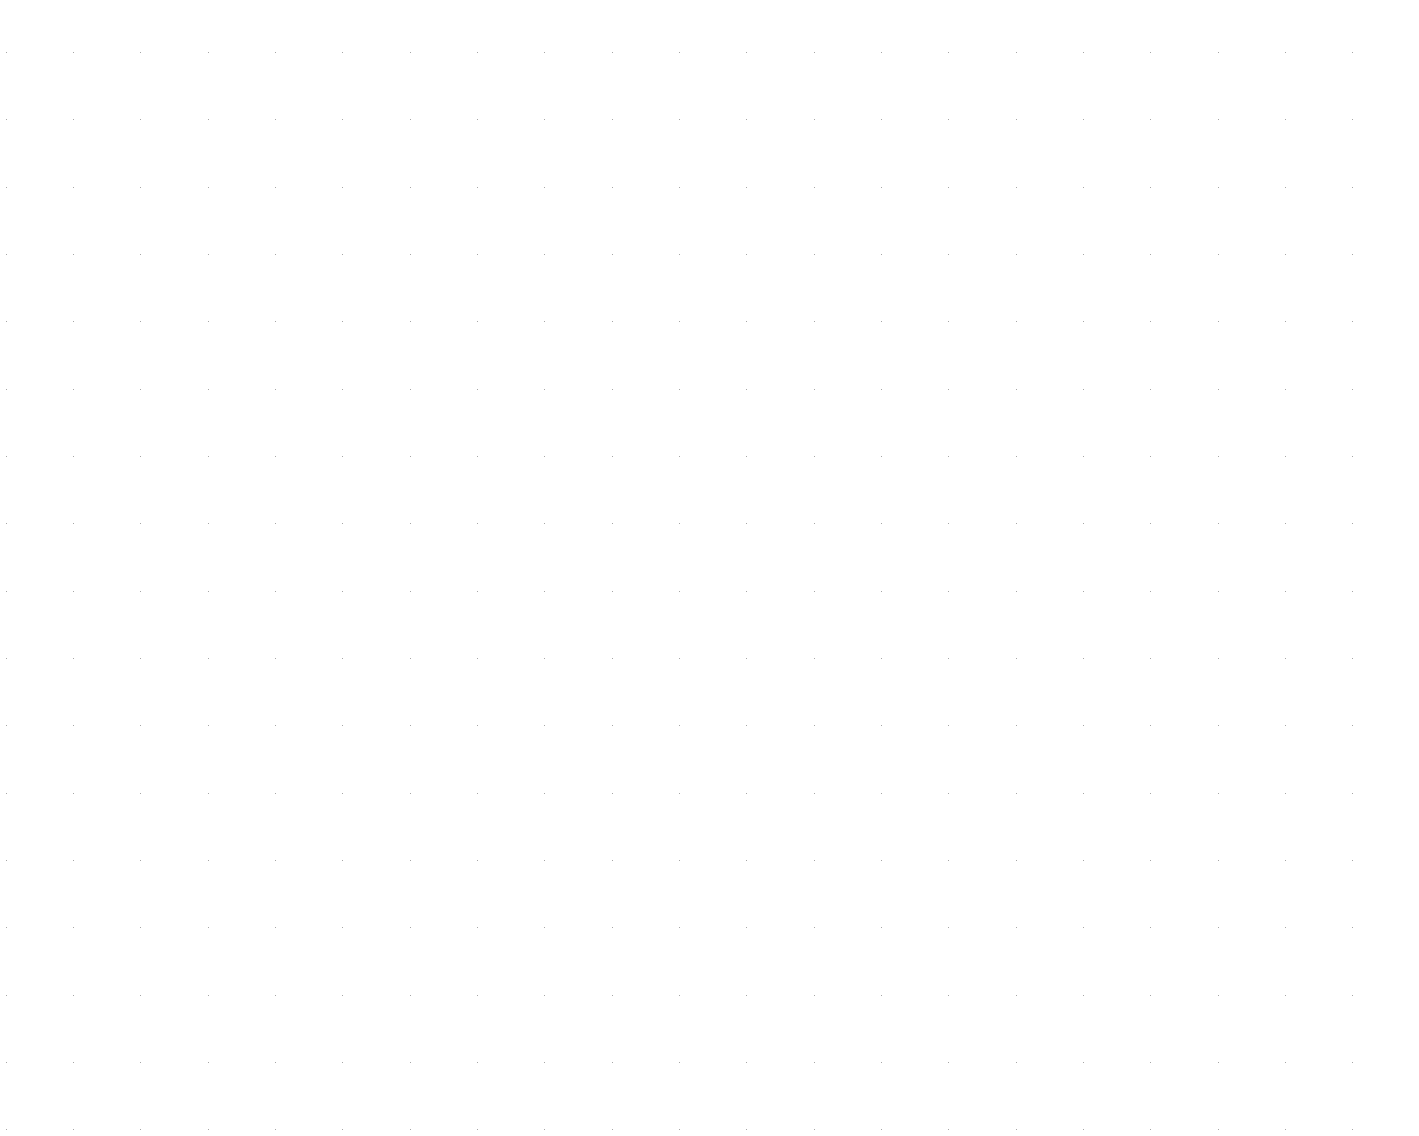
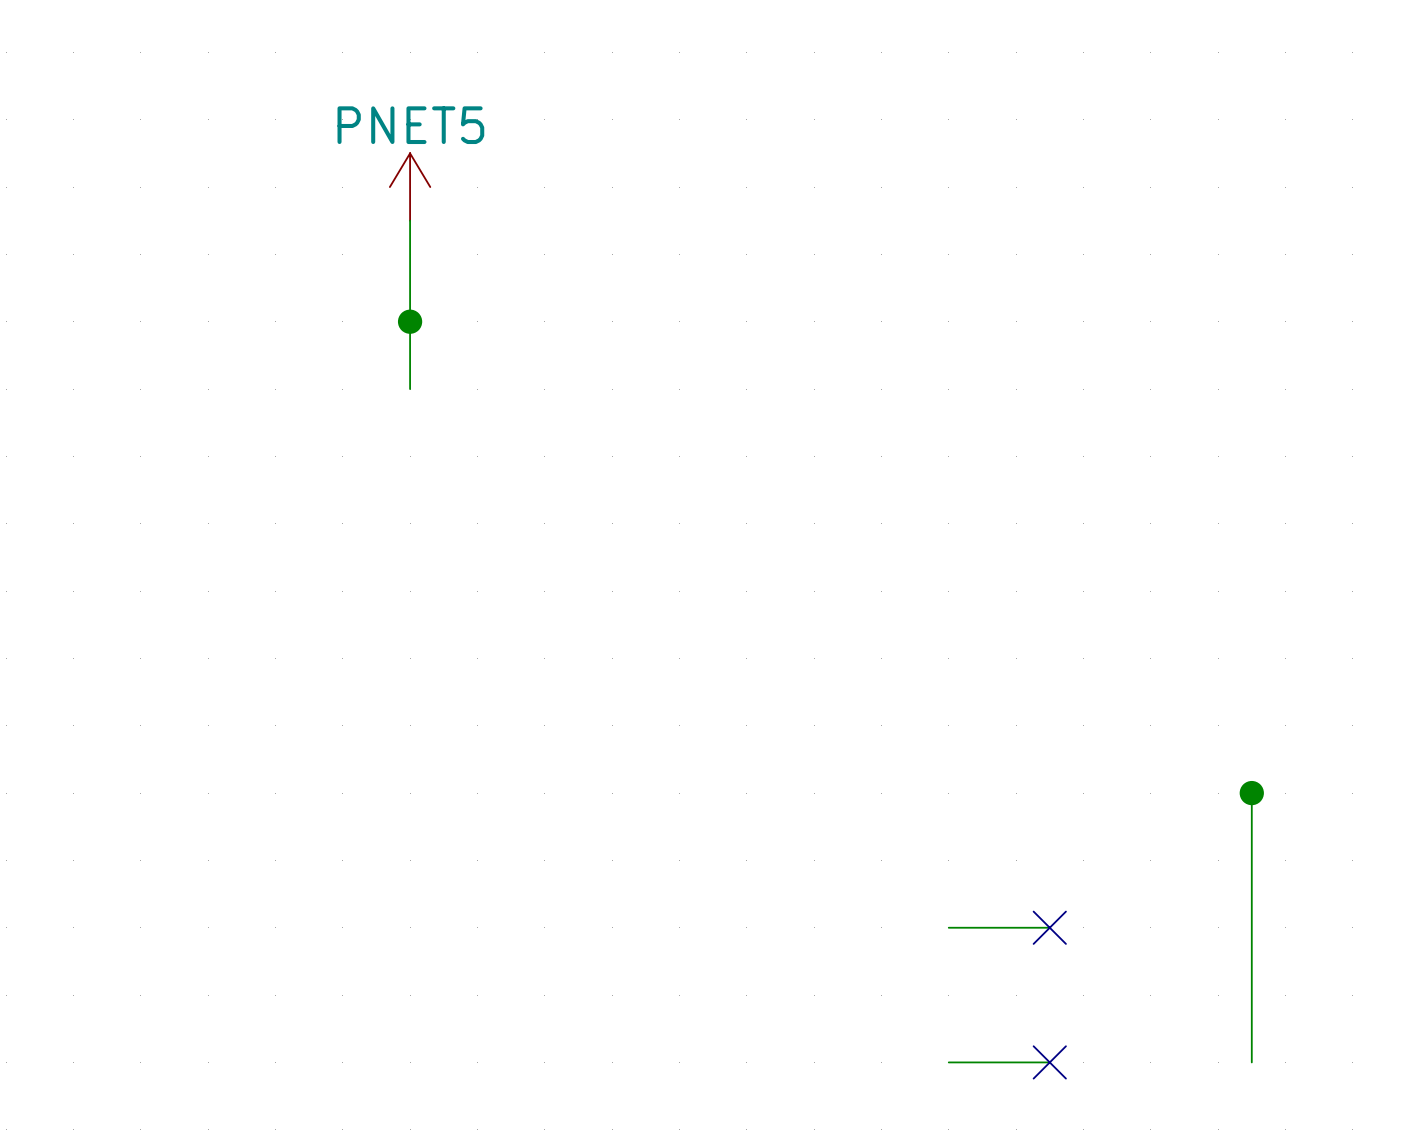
power symbol: none -> PNET5 (410, 187)
wire: none -> (410, 220) (410, 389)
junction: none -> (410, 321)
wire: none -> (1251, 793) (1251, 1062)
junction: none -> (1251, 793)
wire: none -> (948, 927) (1049, 927)
no-connect mark: none -> (1049, 927)
wire: none -> (948, 1062) (1049, 1062)
no-connect mark: none -> (1049, 1062)

